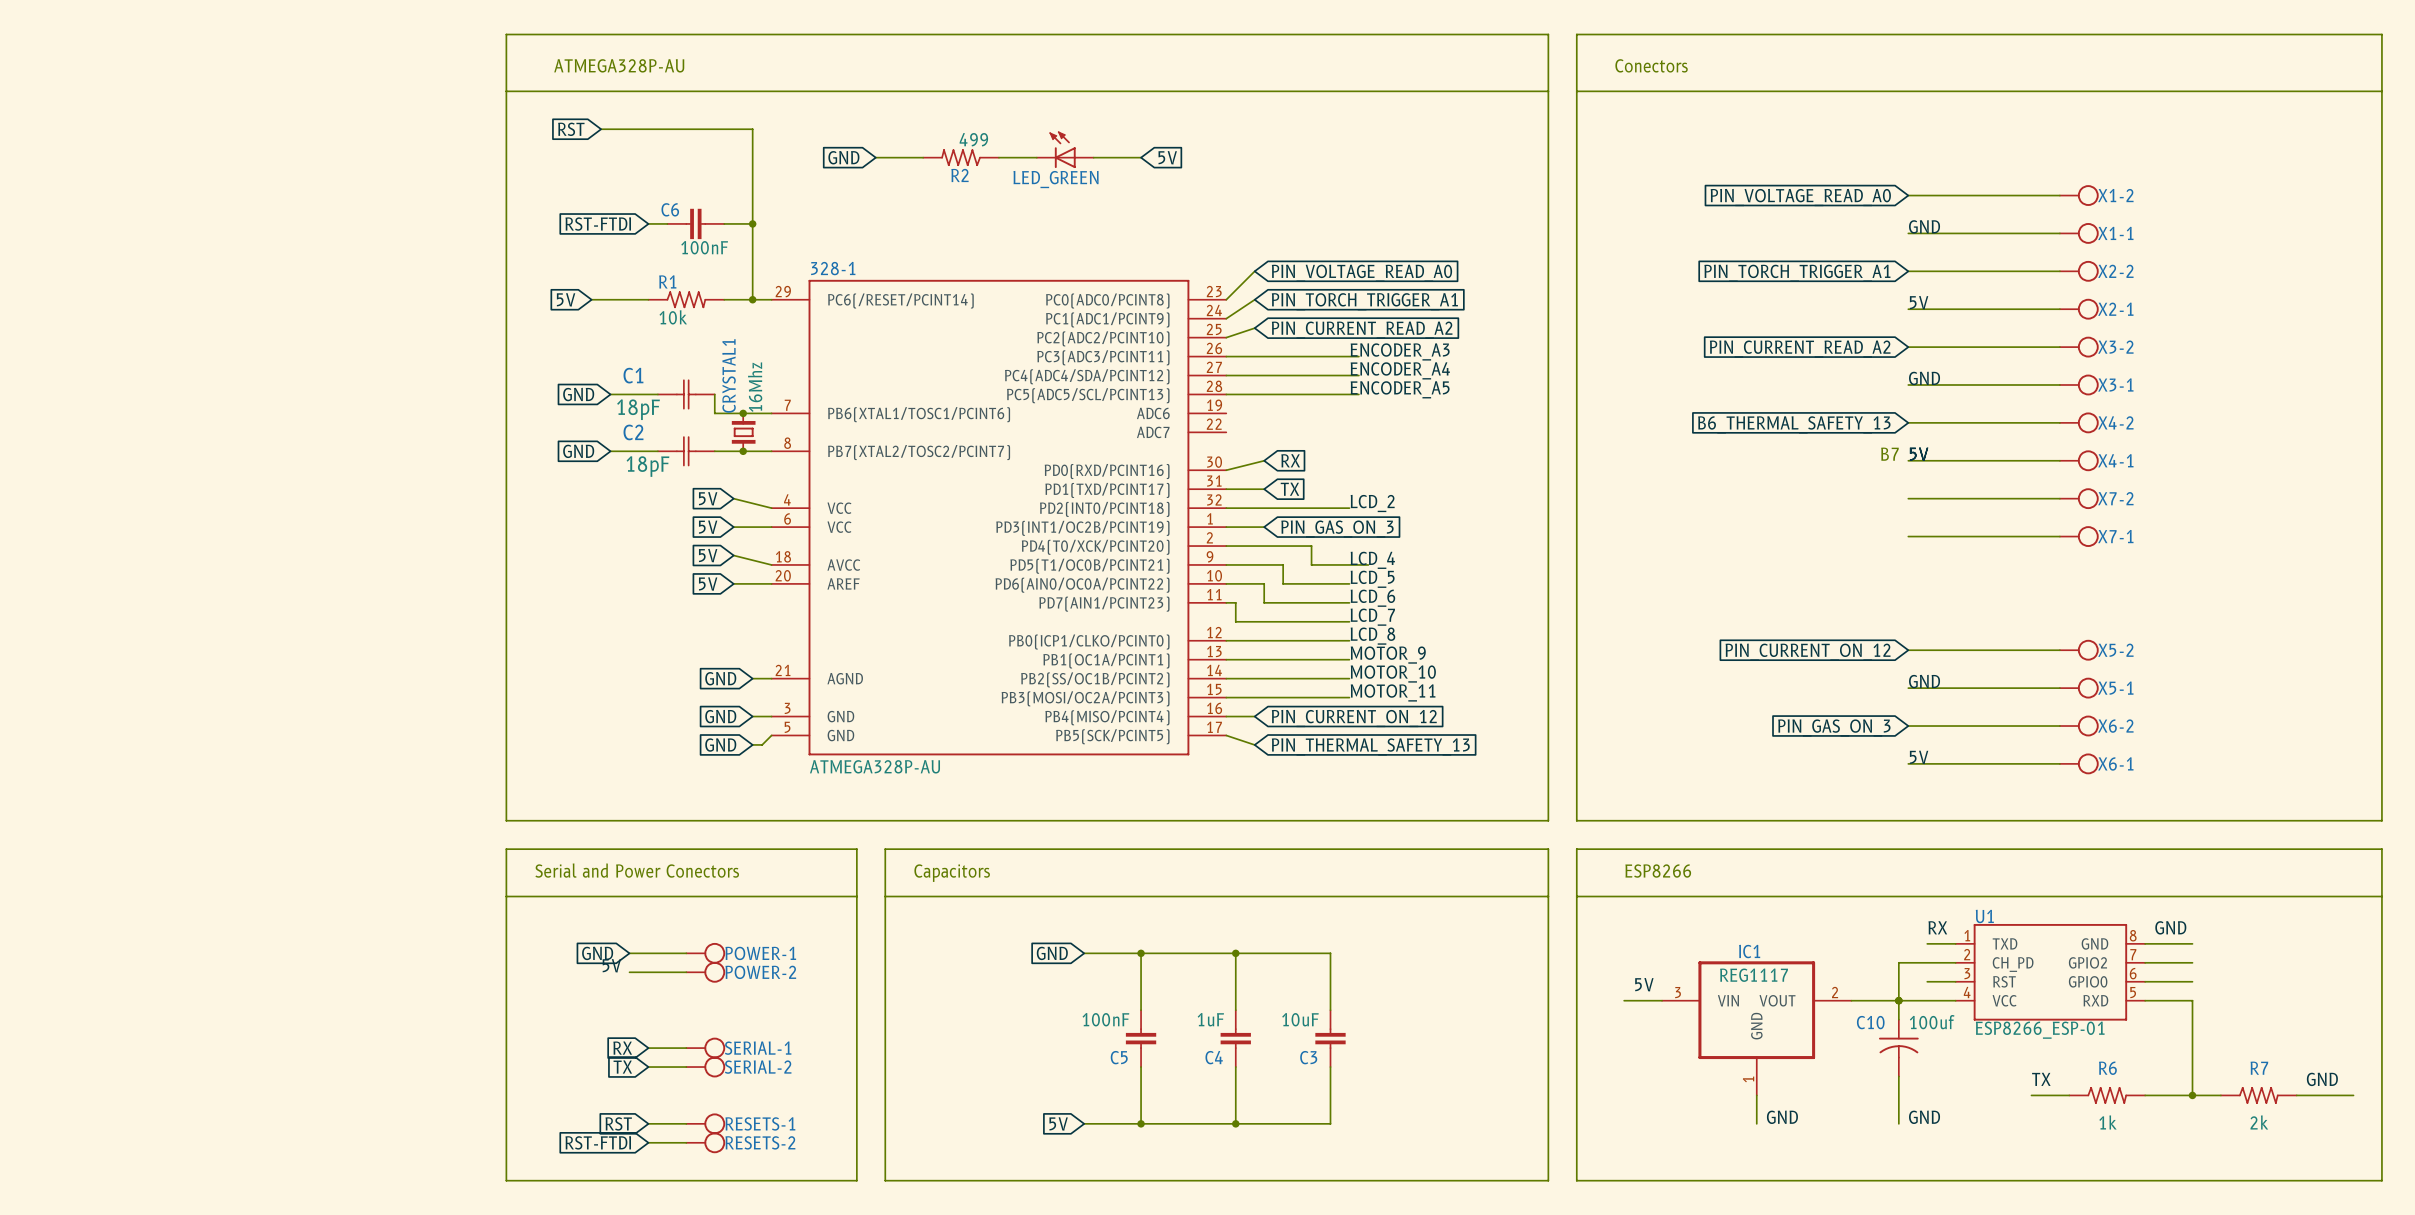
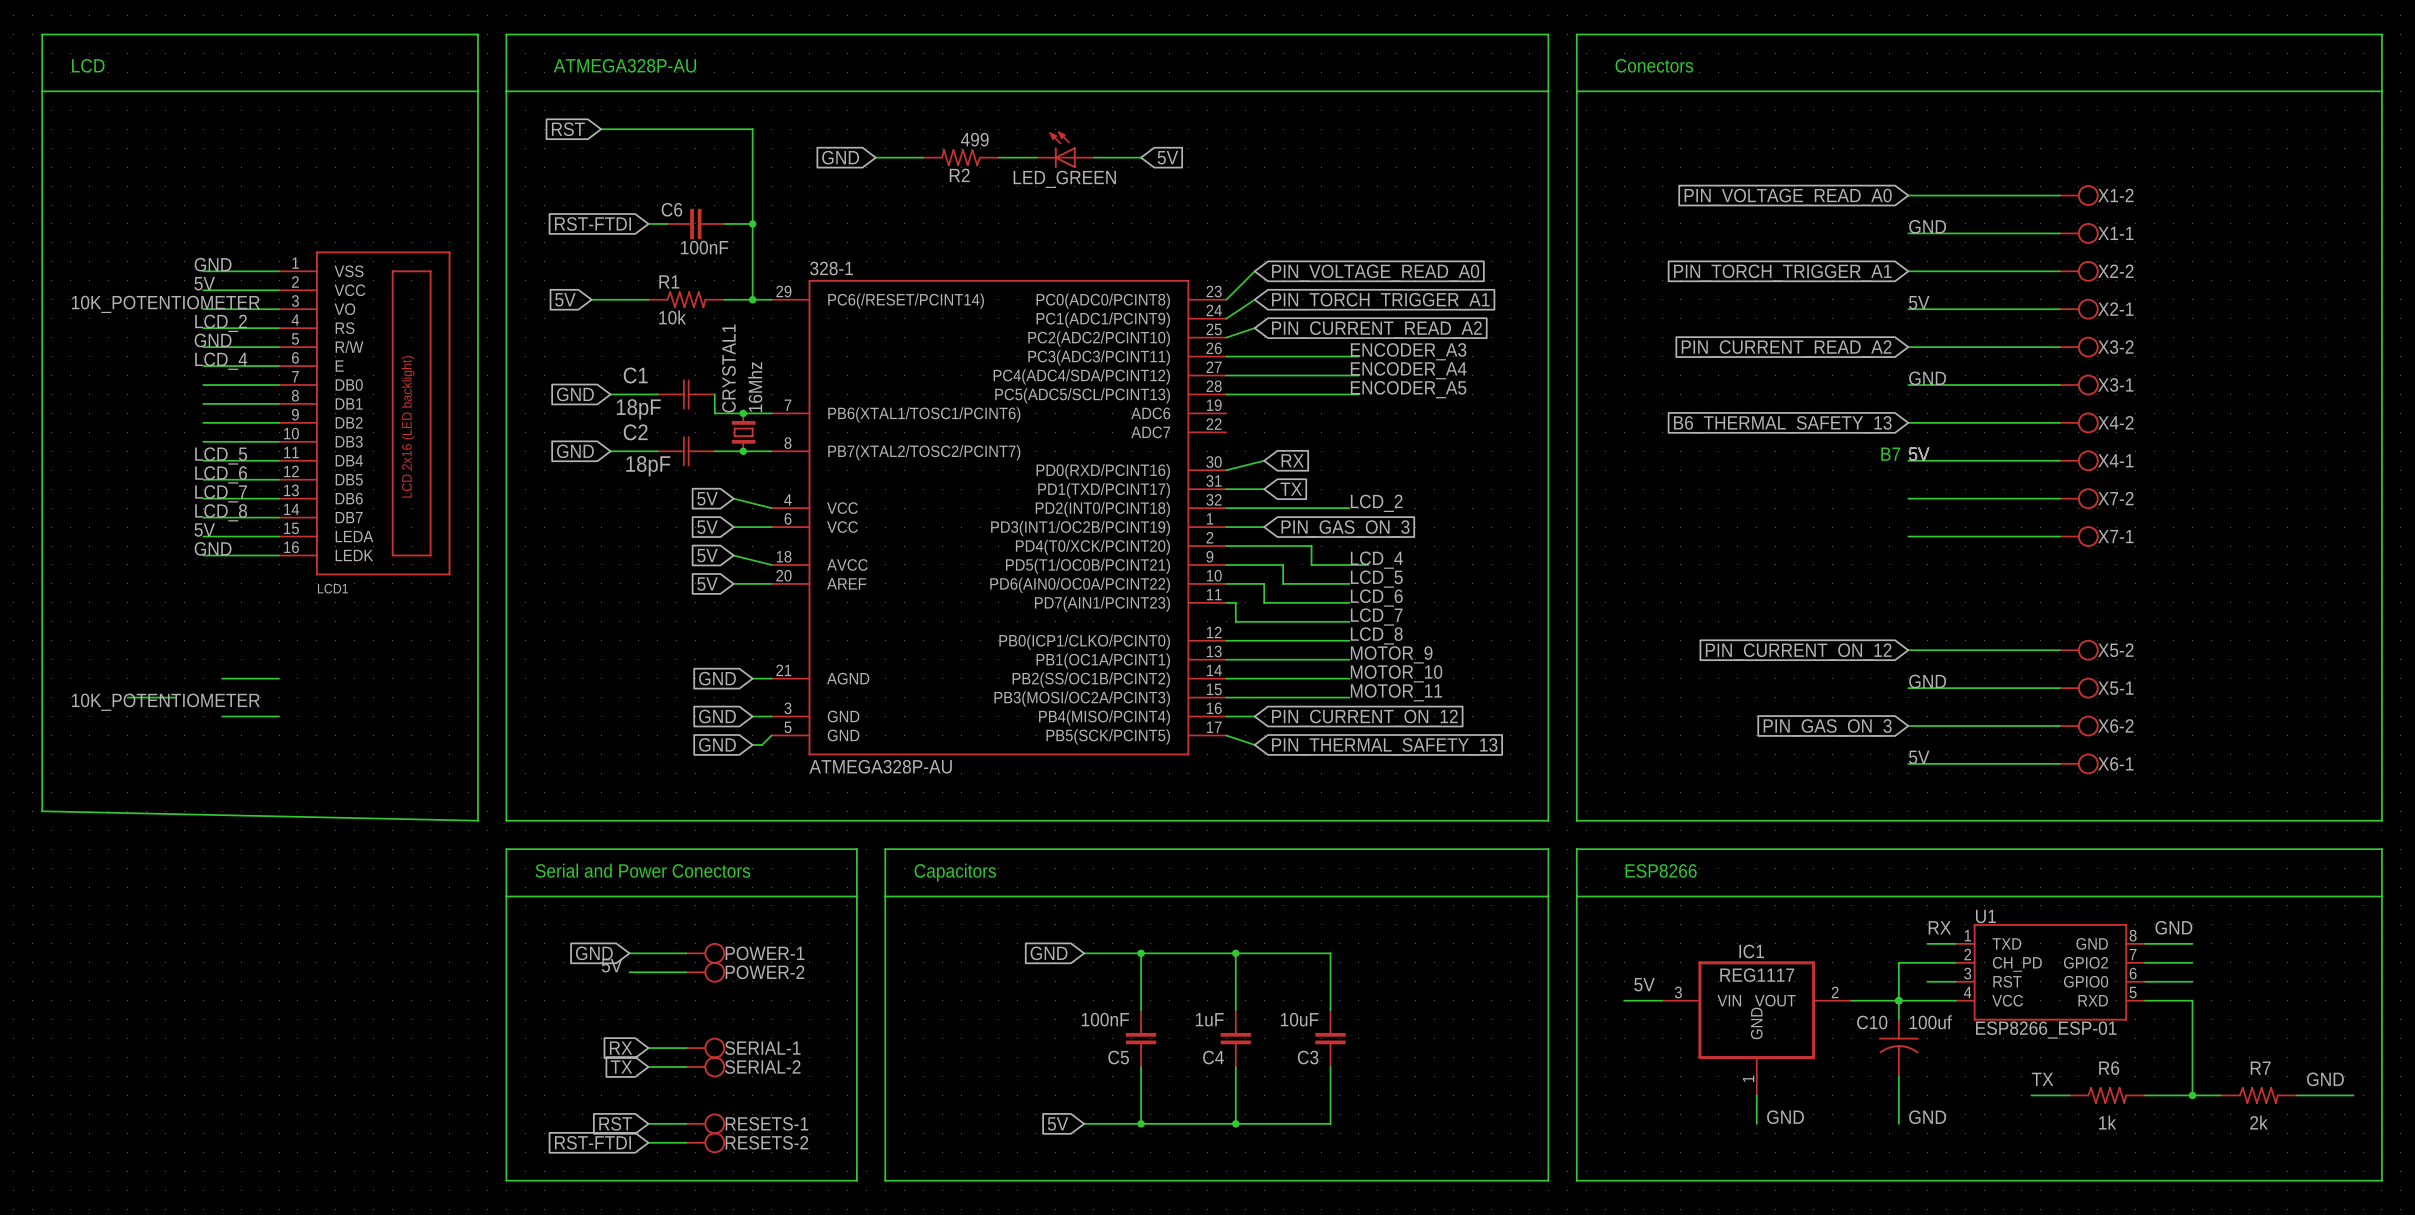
wire: none -> (42, 34) (477, 34) (477, 820) (42, 811) (42, 34)
text: none -> LCD (88, 65)
wire: none -> (42, 91) (477, 91)
label: none -> GND (213, 264)
wire: none -> (203, 271) (279, 271)
label: none -> 5V (204, 283)
wire: none -> (203, 290) (279, 290)
label: none -> 10K_POTENTIOMETER (165, 304)
wire: none -> (203, 309) (279, 309)
label: none -> LCD_2 (221, 323)
wire: none -> (203, 328) (279, 328)
label: none -> GND (213, 340)
wire: none -> (203, 347) (279, 347)
label: none -> LCD_4 (221, 361)
wire: none -> (203, 366) (279, 366)
wire: none -> (203, 384) (279, 384)
wire: none -> (203, 403) (279, 403)
LCD1: none -> (364, 413)
wire: none -> (203, 422) (279, 422)
wire: none -> (203, 441) (279, 441)
label: none -> LCD_5 (221, 455)
wire: none -> (203, 460) (279, 460)
label: none -> LCD_6 (221, 474)
wire: none -> (203, 479) (279, 479)
label: none -> LCD_7 (221, 493)
wire: none -> (203, 498) (279, 498)
label: none -> LCD_8 (221, 512)
wire: none -> (203, 517) (279, 517)
label: none -> 5V (204, 530)
wire: none -> (203, 536) (279, 536)
label: none -> GND (213, 548)
wire: none -> (203, 555) (279, 555)
wire: none -> (222, 678) (279, 678)
wire: none -> (127, 697) (174, 697)
label: none -> 10K_POTENTIOMETER (165, 702)
wire: none -> (222, 716) (279, 716)

